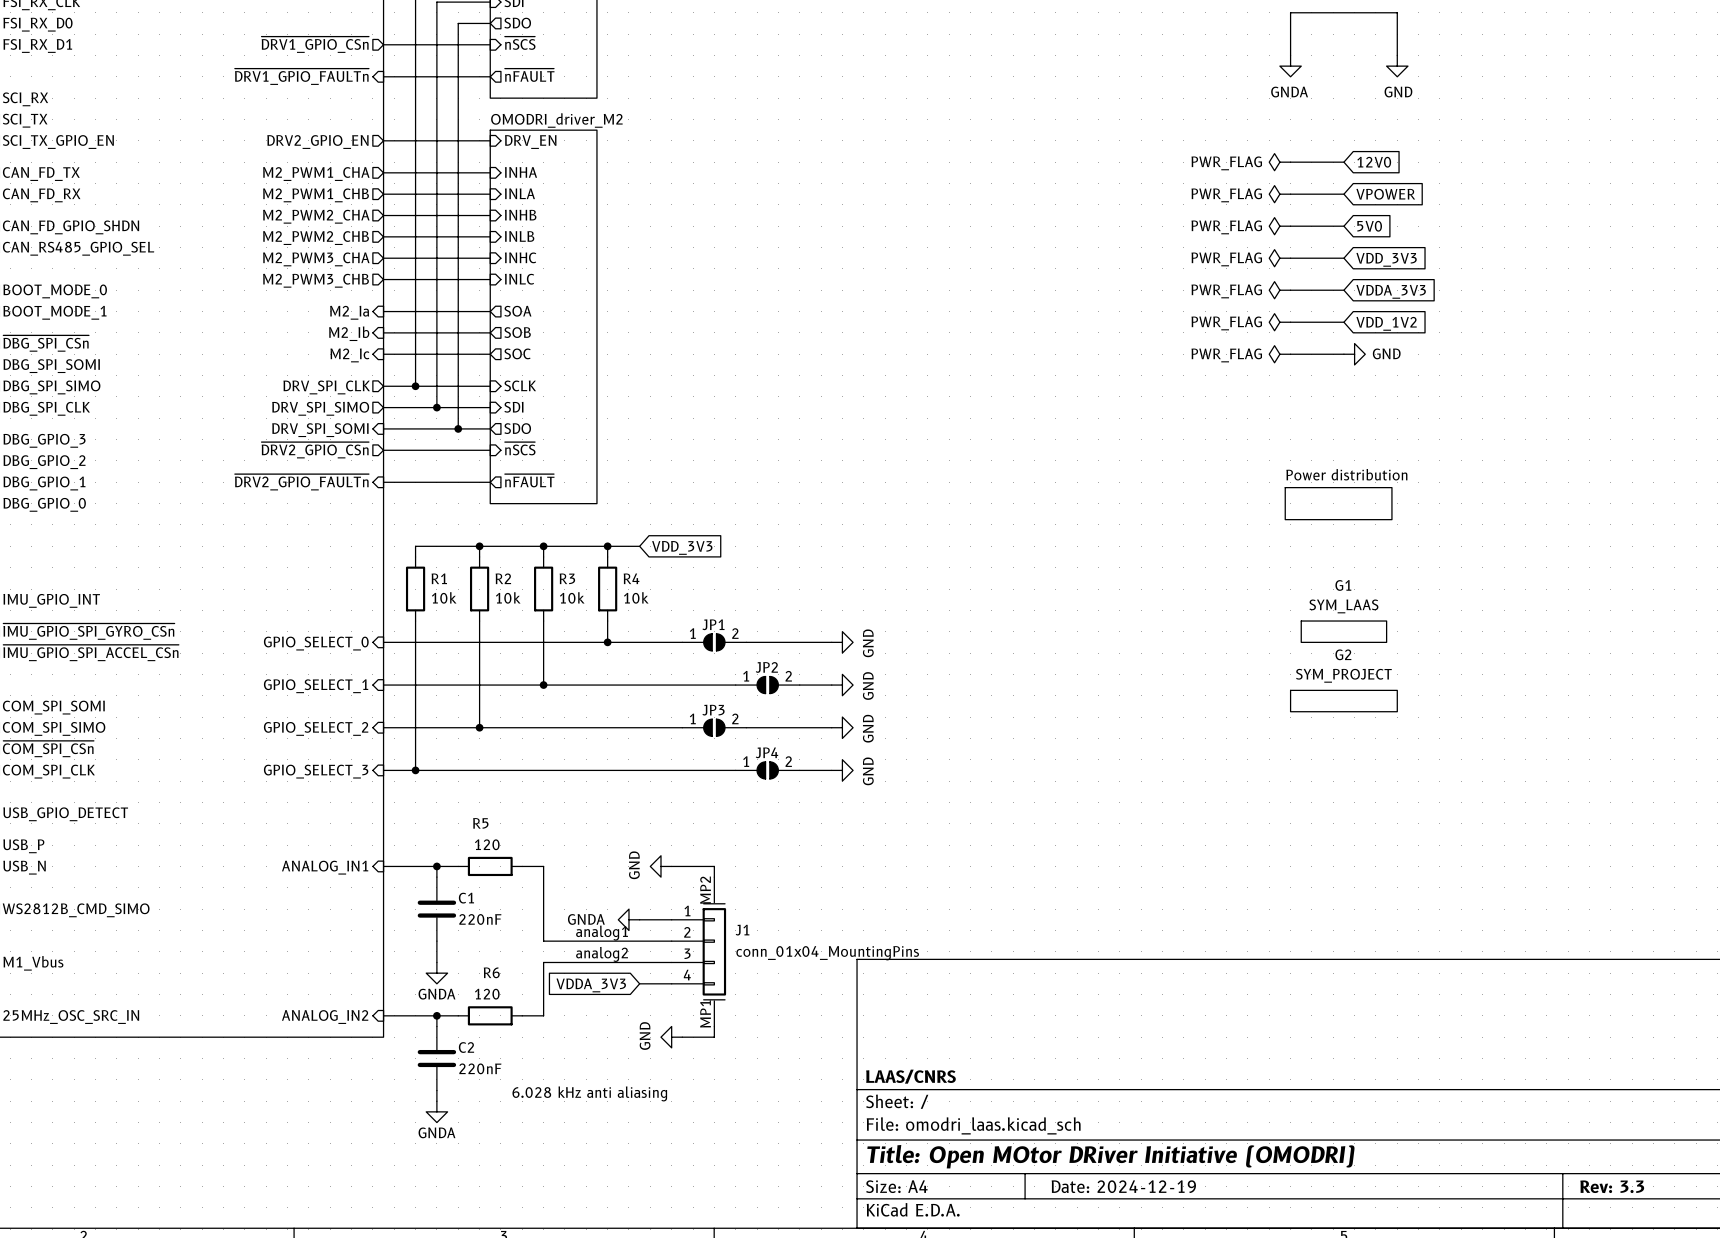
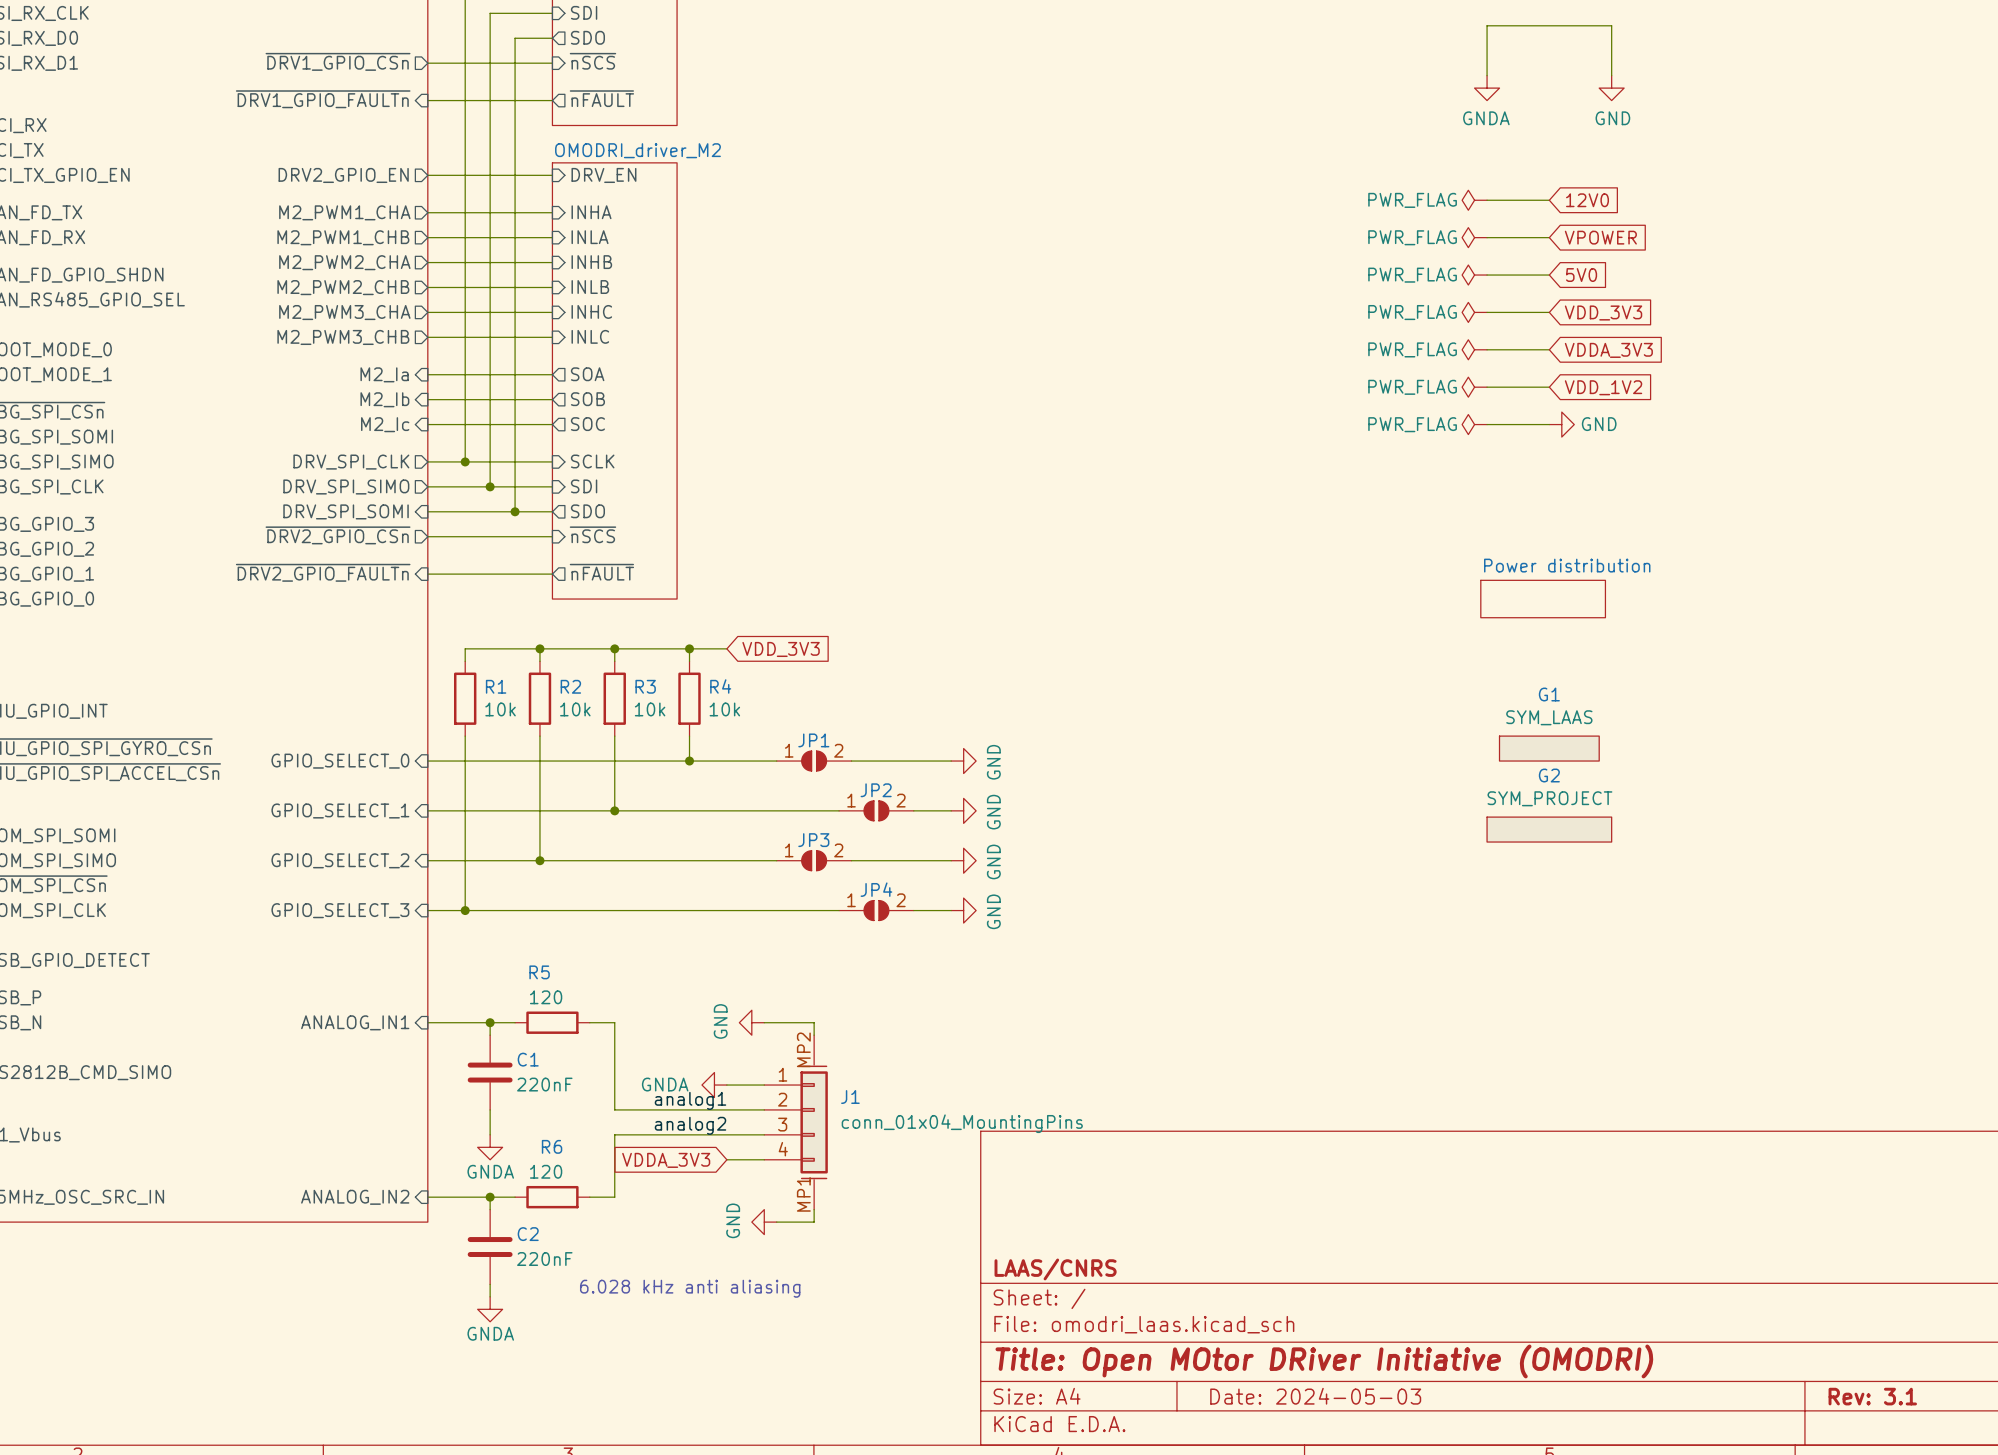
title block: Date: 2024-12-19 (1123, 1186) -> Date: 2024-05-03 (1315, 1396)
title block: Rev: 3.3 (1612, 1186) -> Rev: 3.1 (1872, 1396)

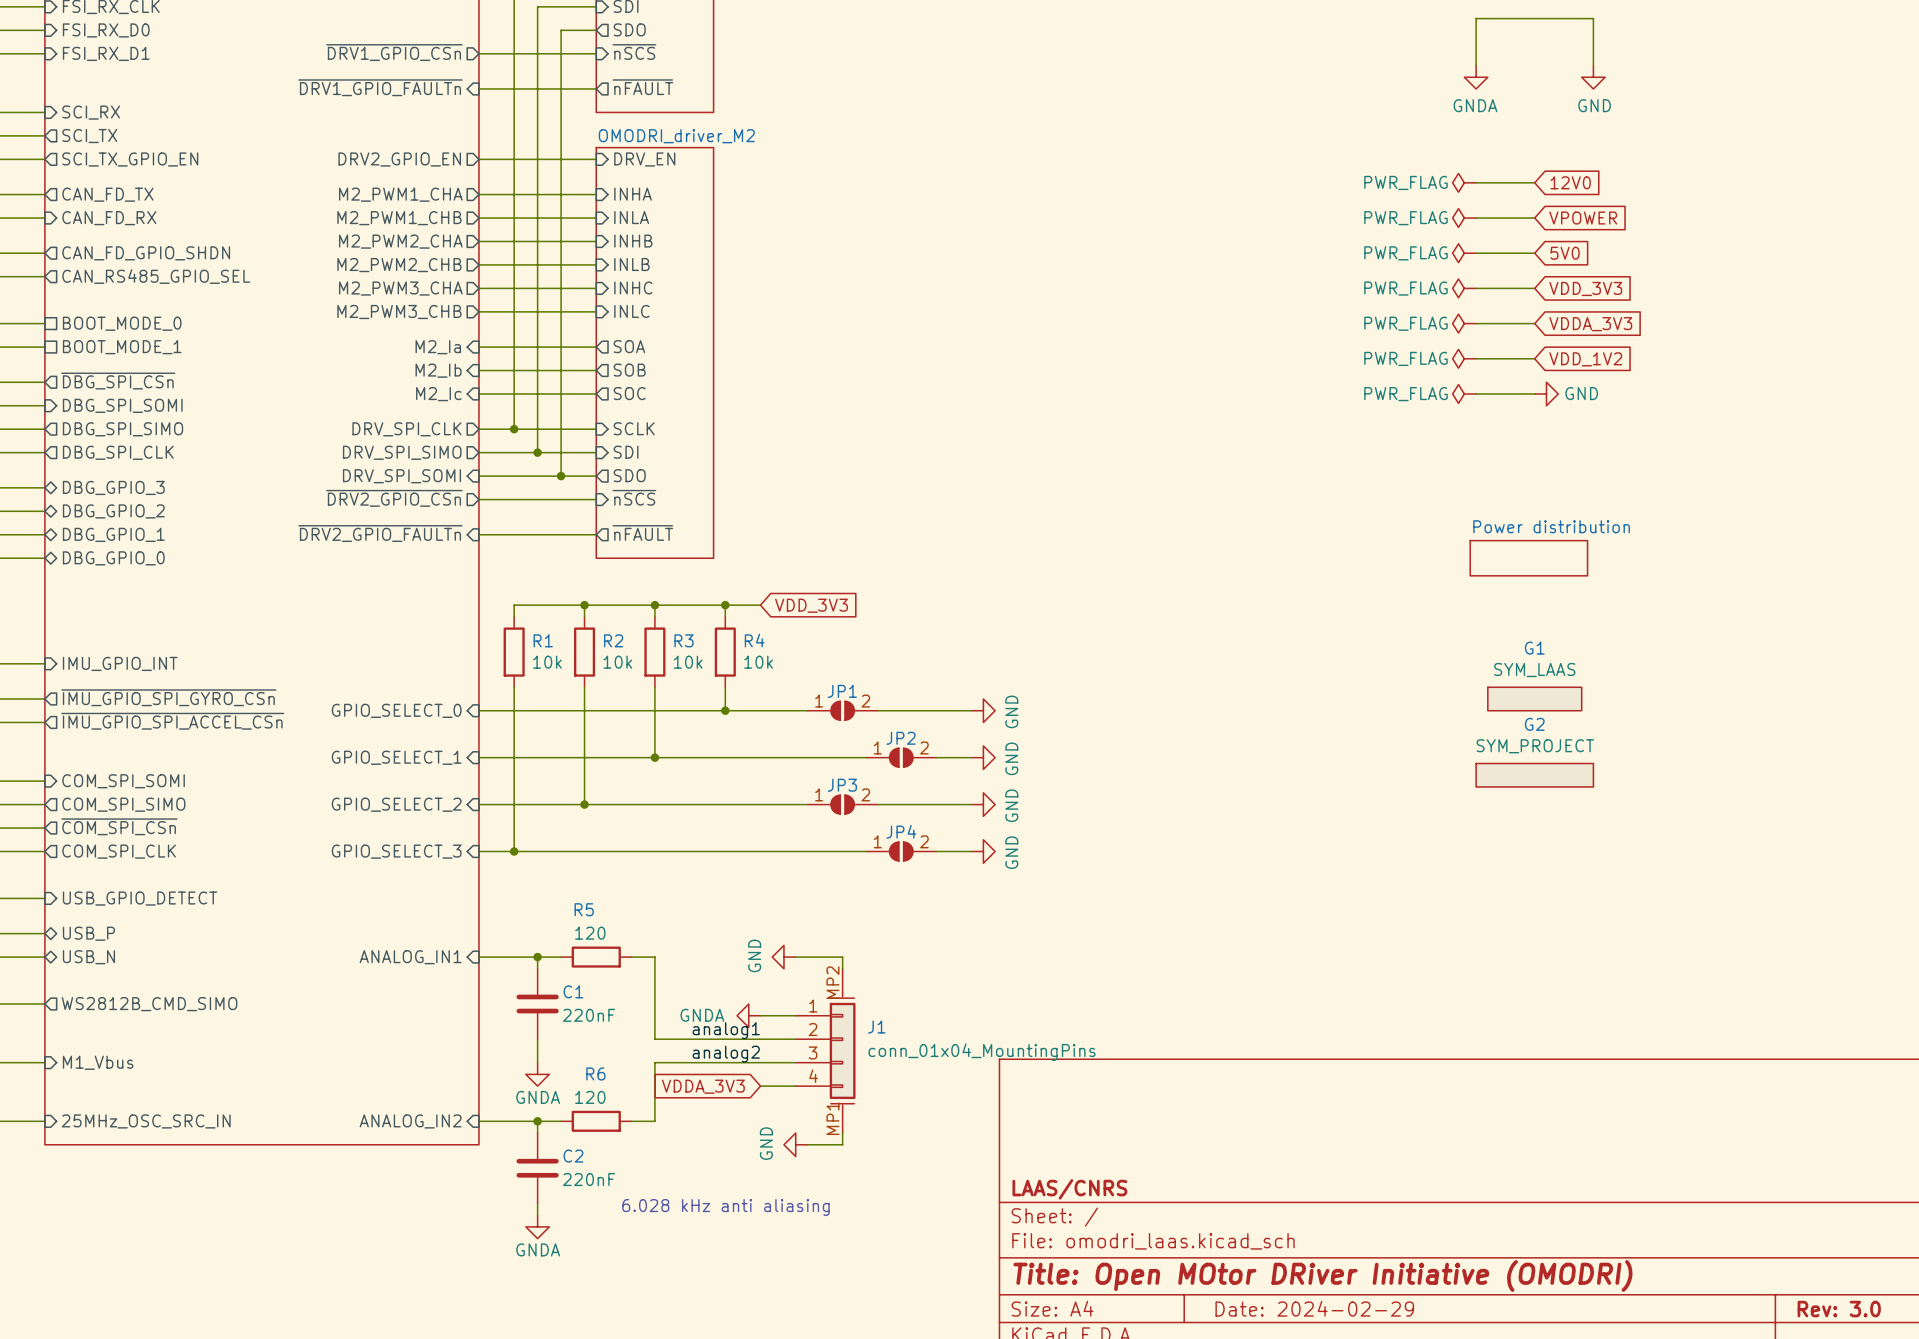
title block: Date: 2024-05-03 (1315, 1396) -> Date: 2024-02-29 (1314, 1308)
title block: Rev: 3.1 (1872, 1396) -> Rev: 3.0 (1839, 1309)

